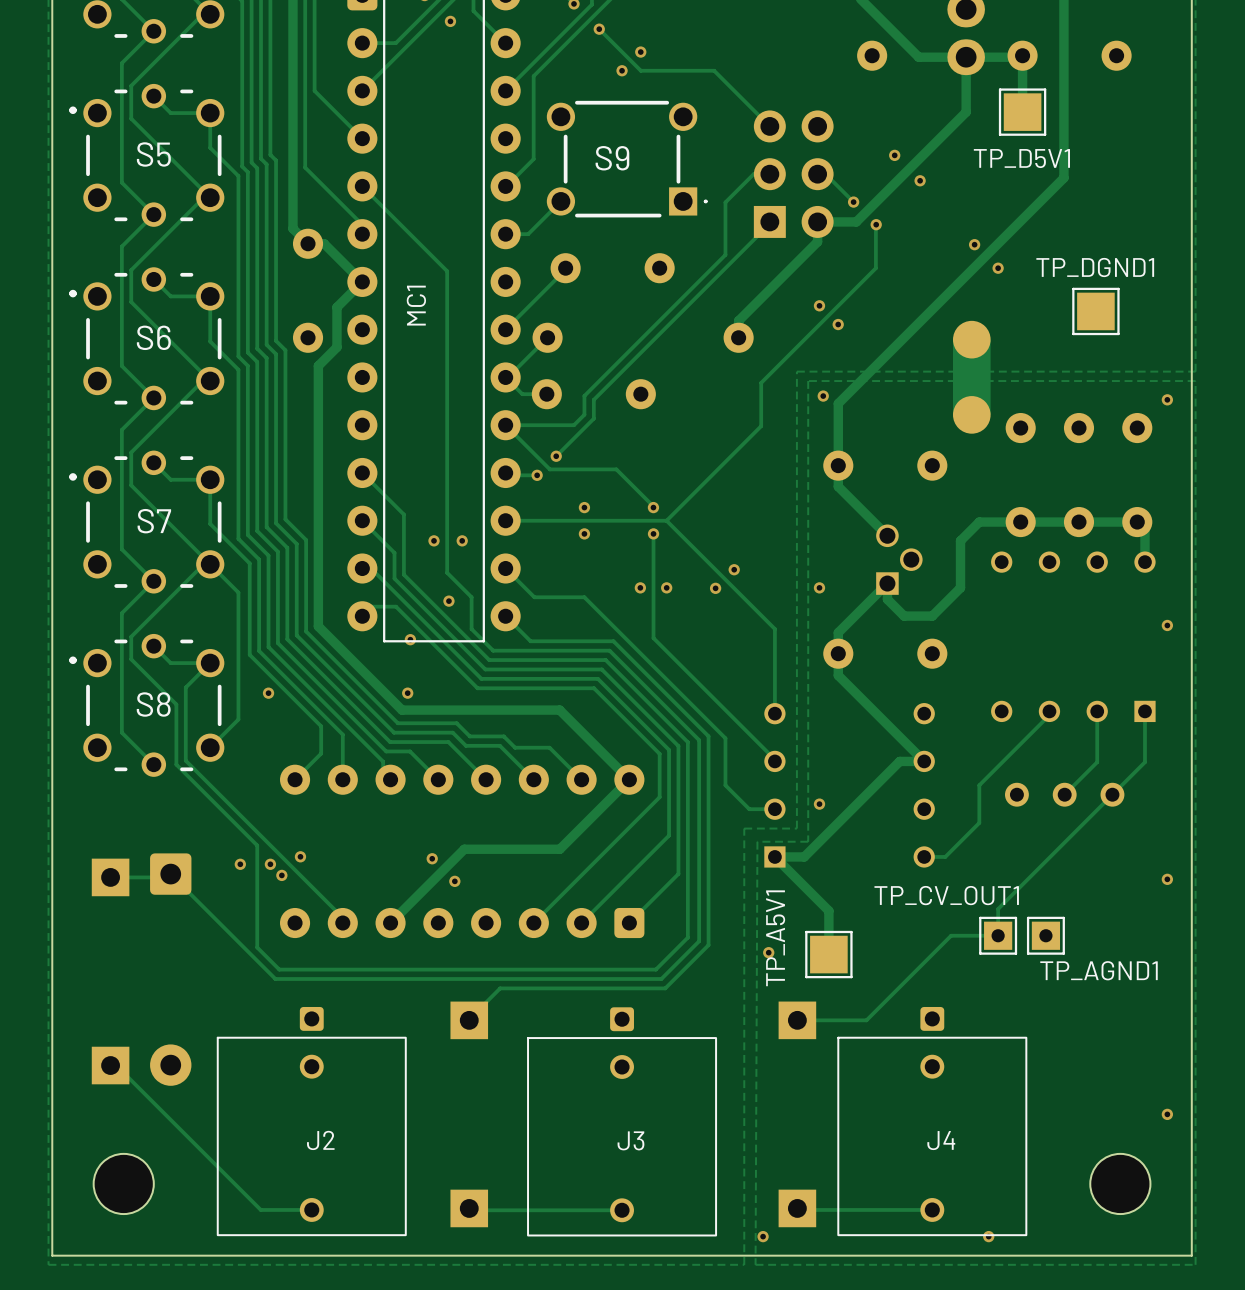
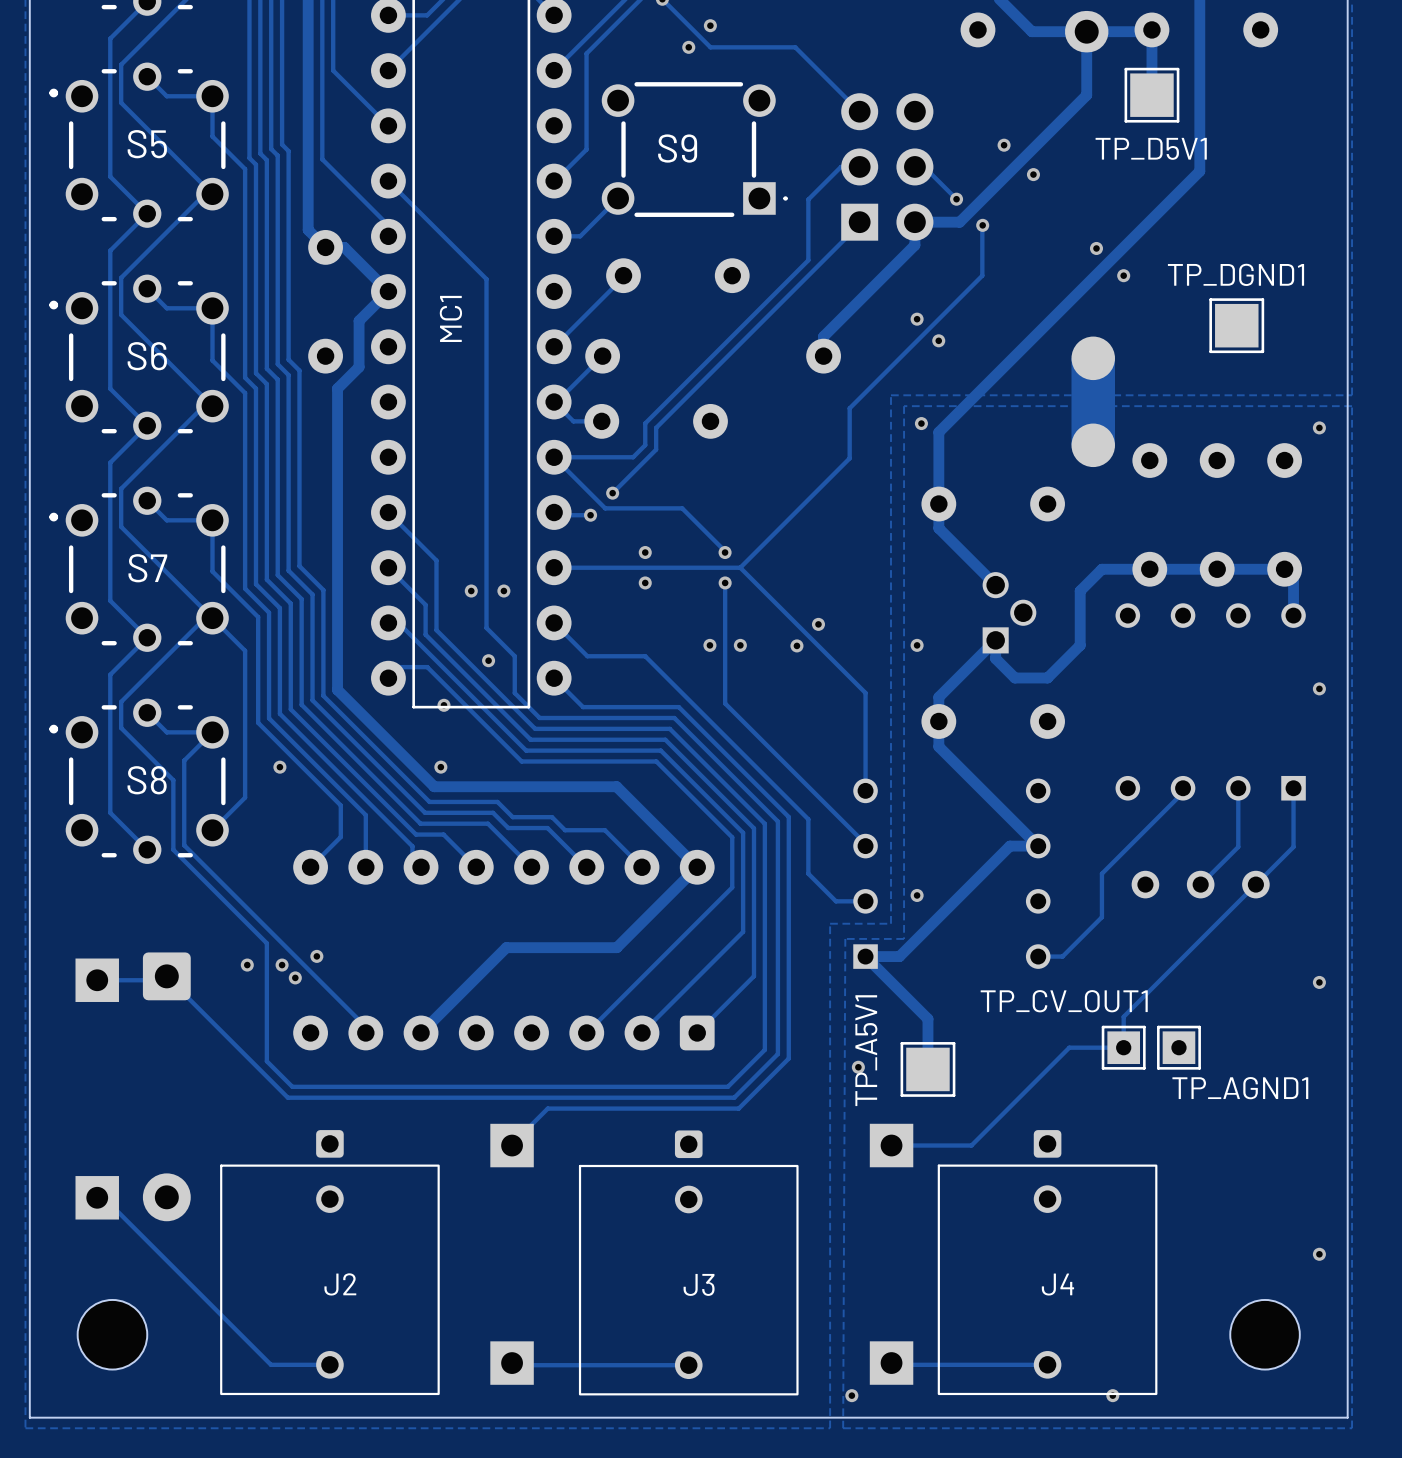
via: (432, 858) -> none
via: (454, 881) -> none

